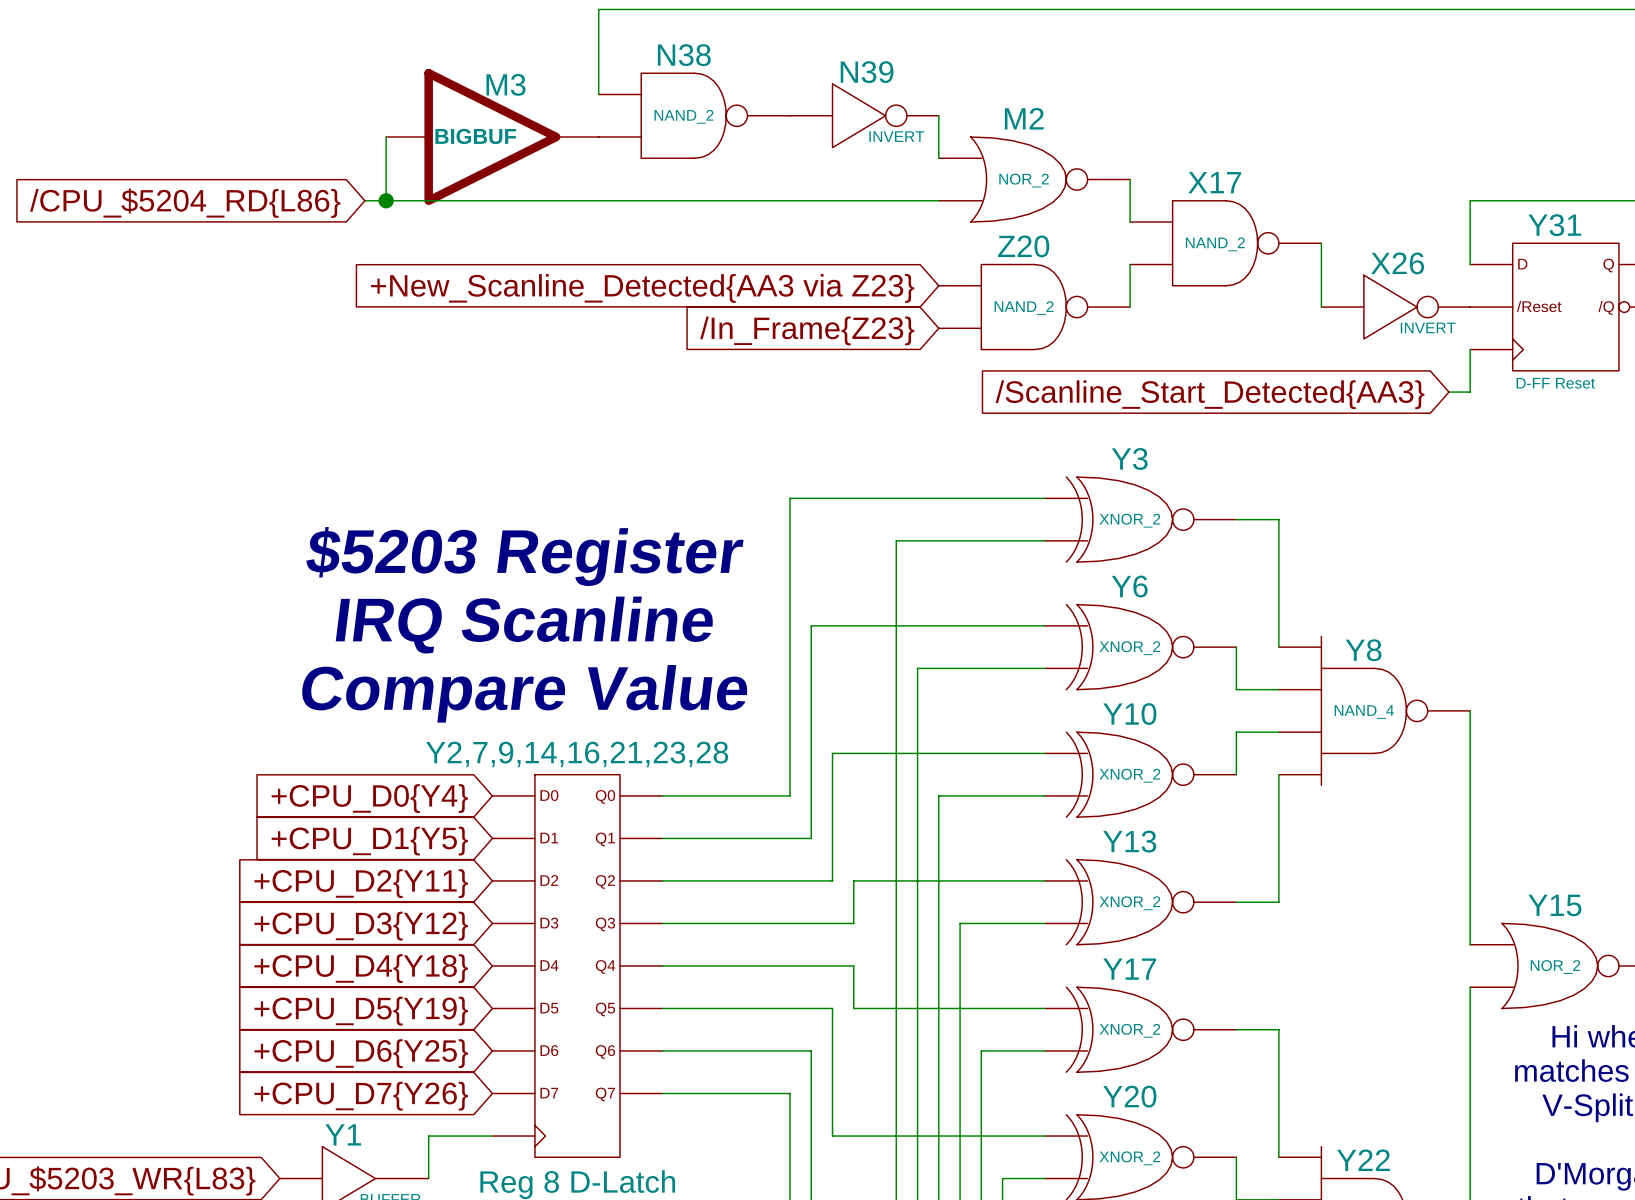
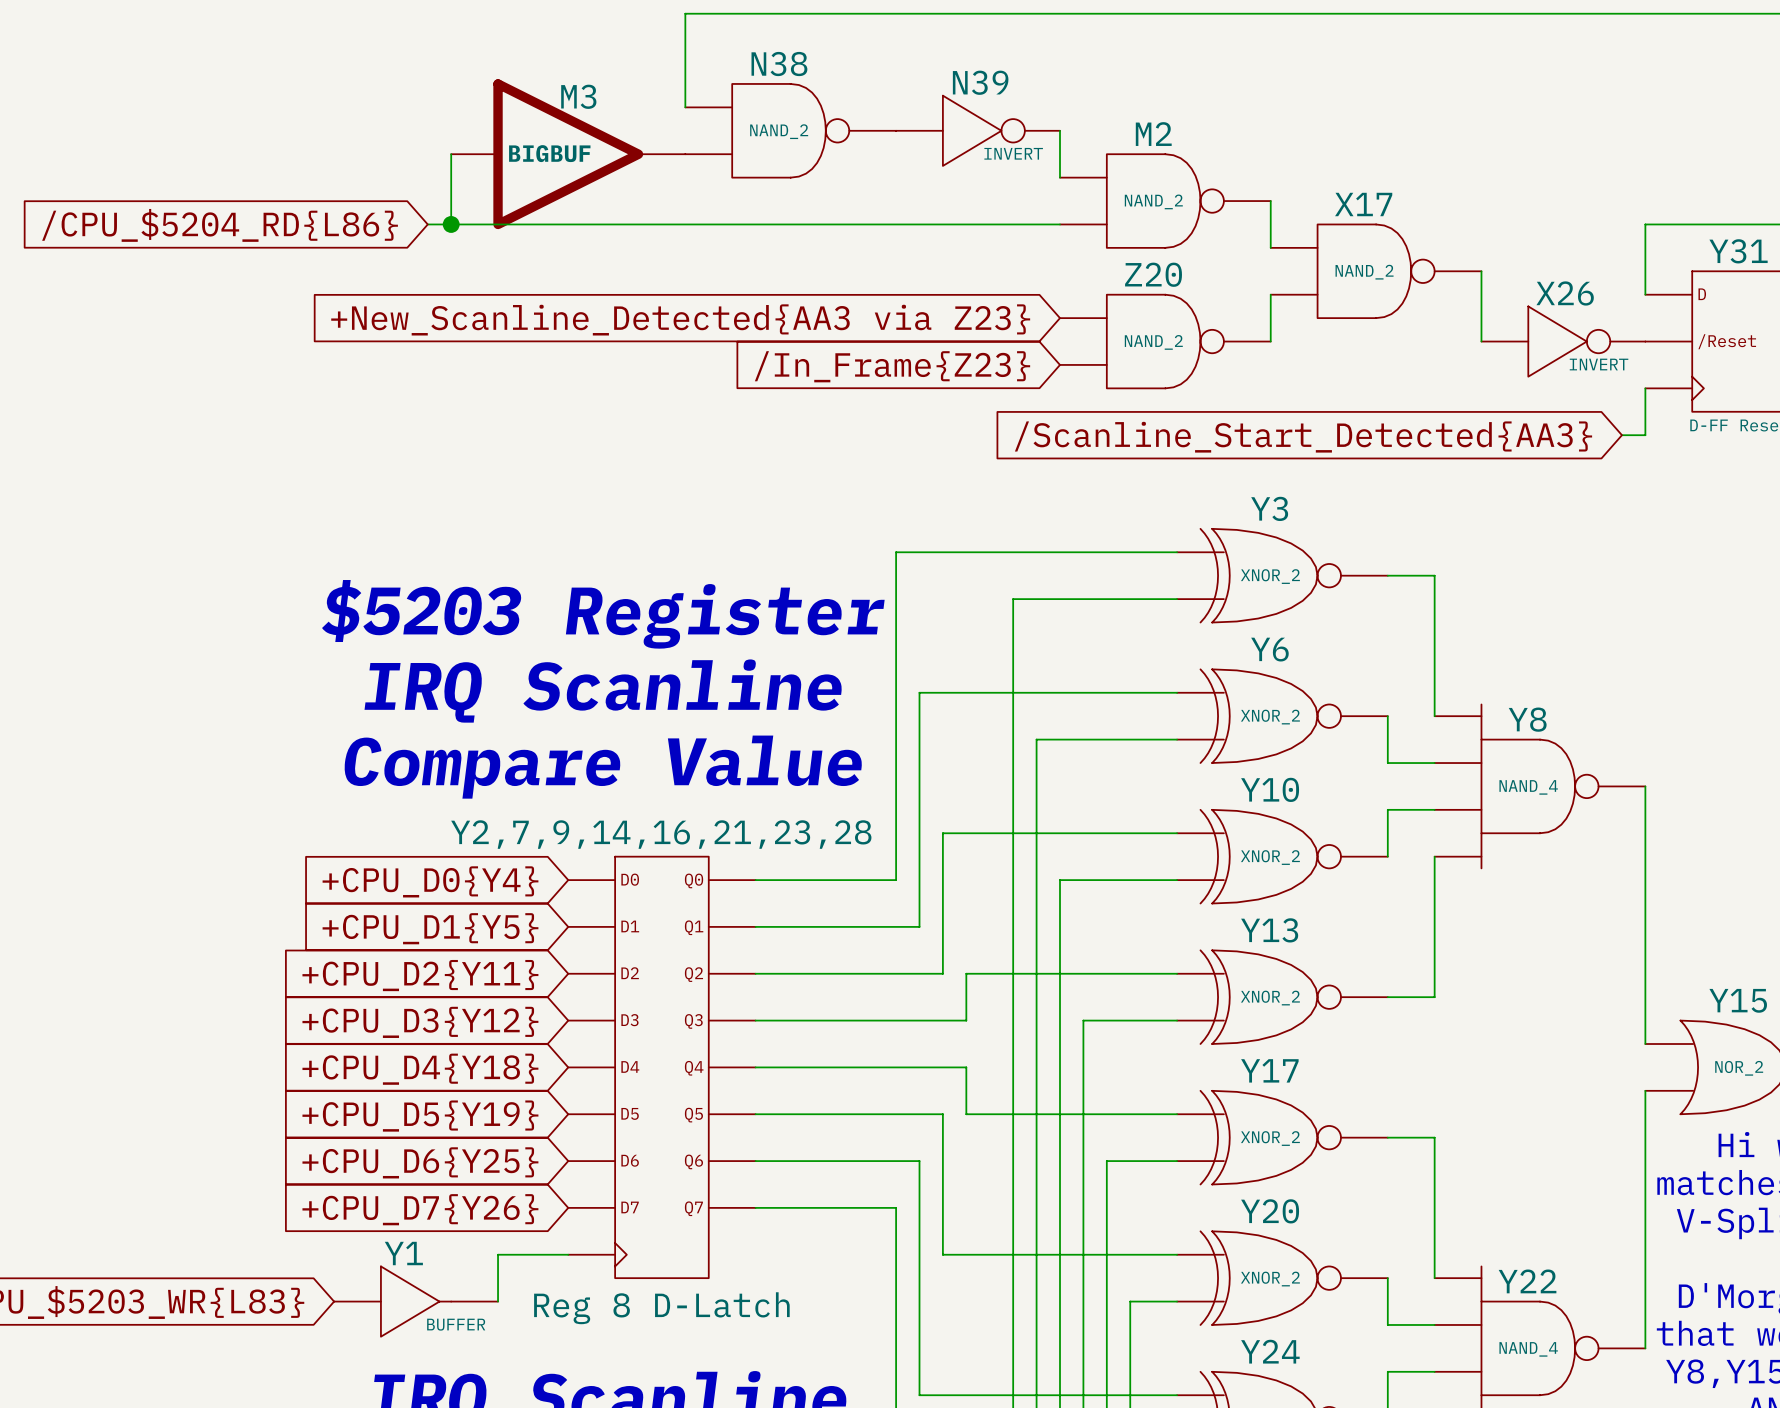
M2 symbol: [938, 137, 1131, 223] -> [1059, 154, 1271, 248]
M2 value: NOR_2 (1024, 180) -> NAND_2 (1153, 201)

